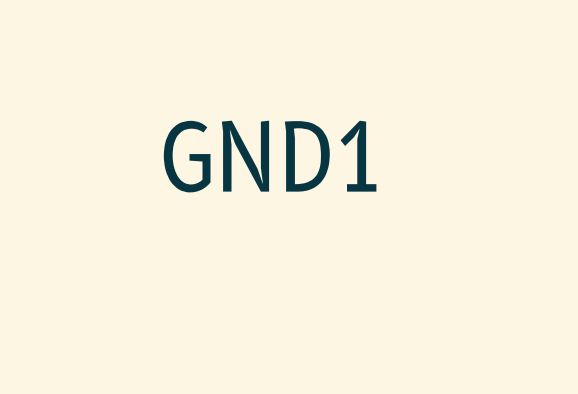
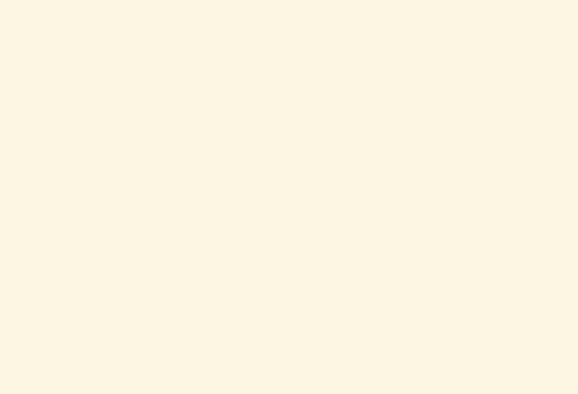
label: GND1 (270, 156) -> none

